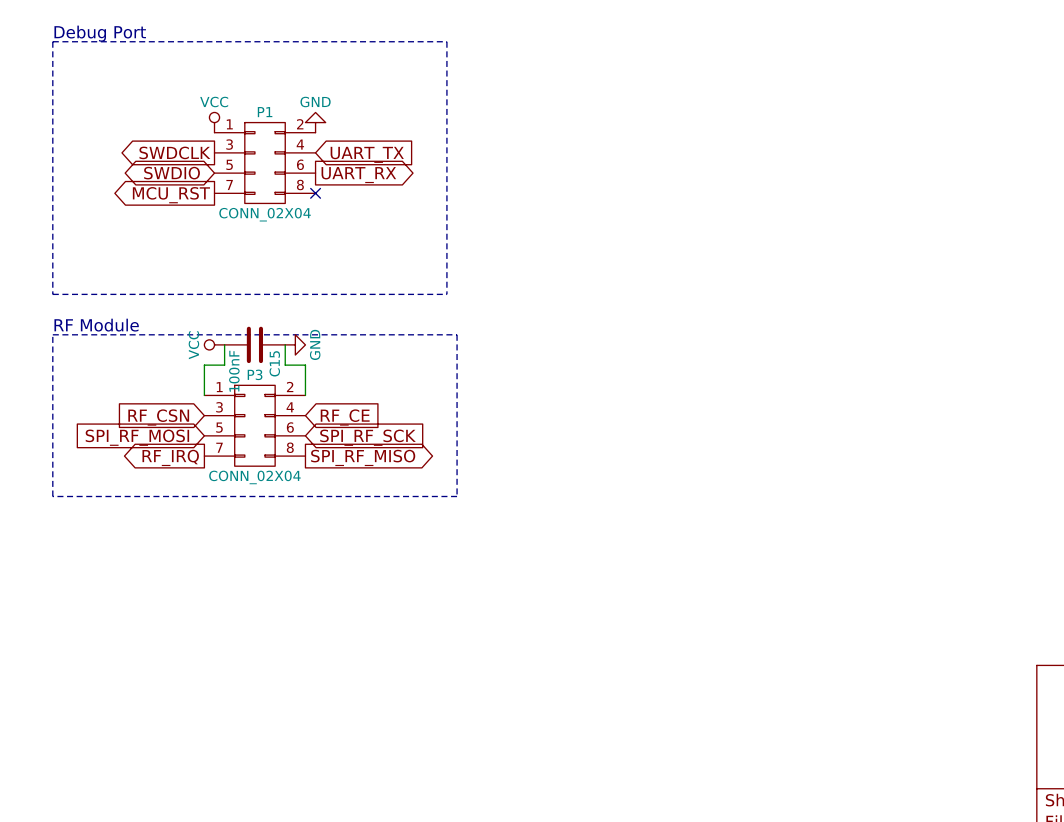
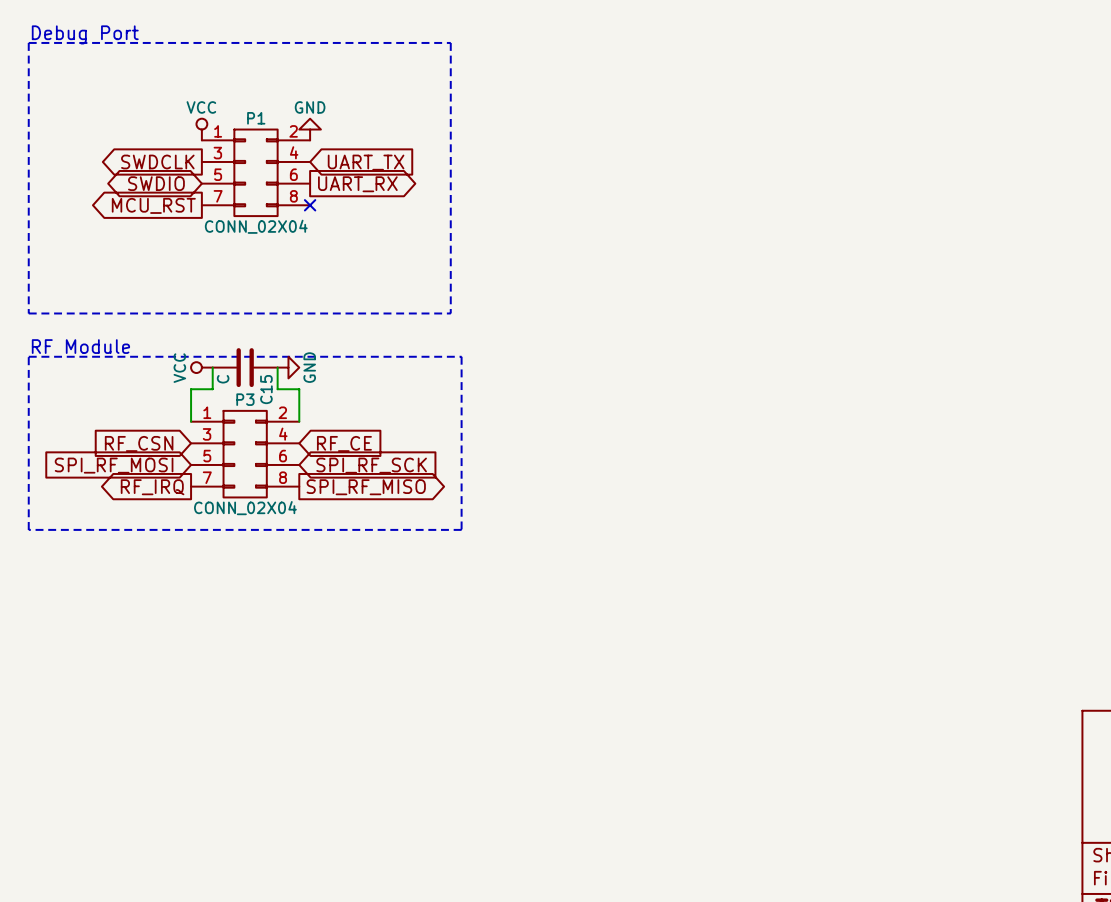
C15 value: 100nF (234, 371) -> C (223, 379)

